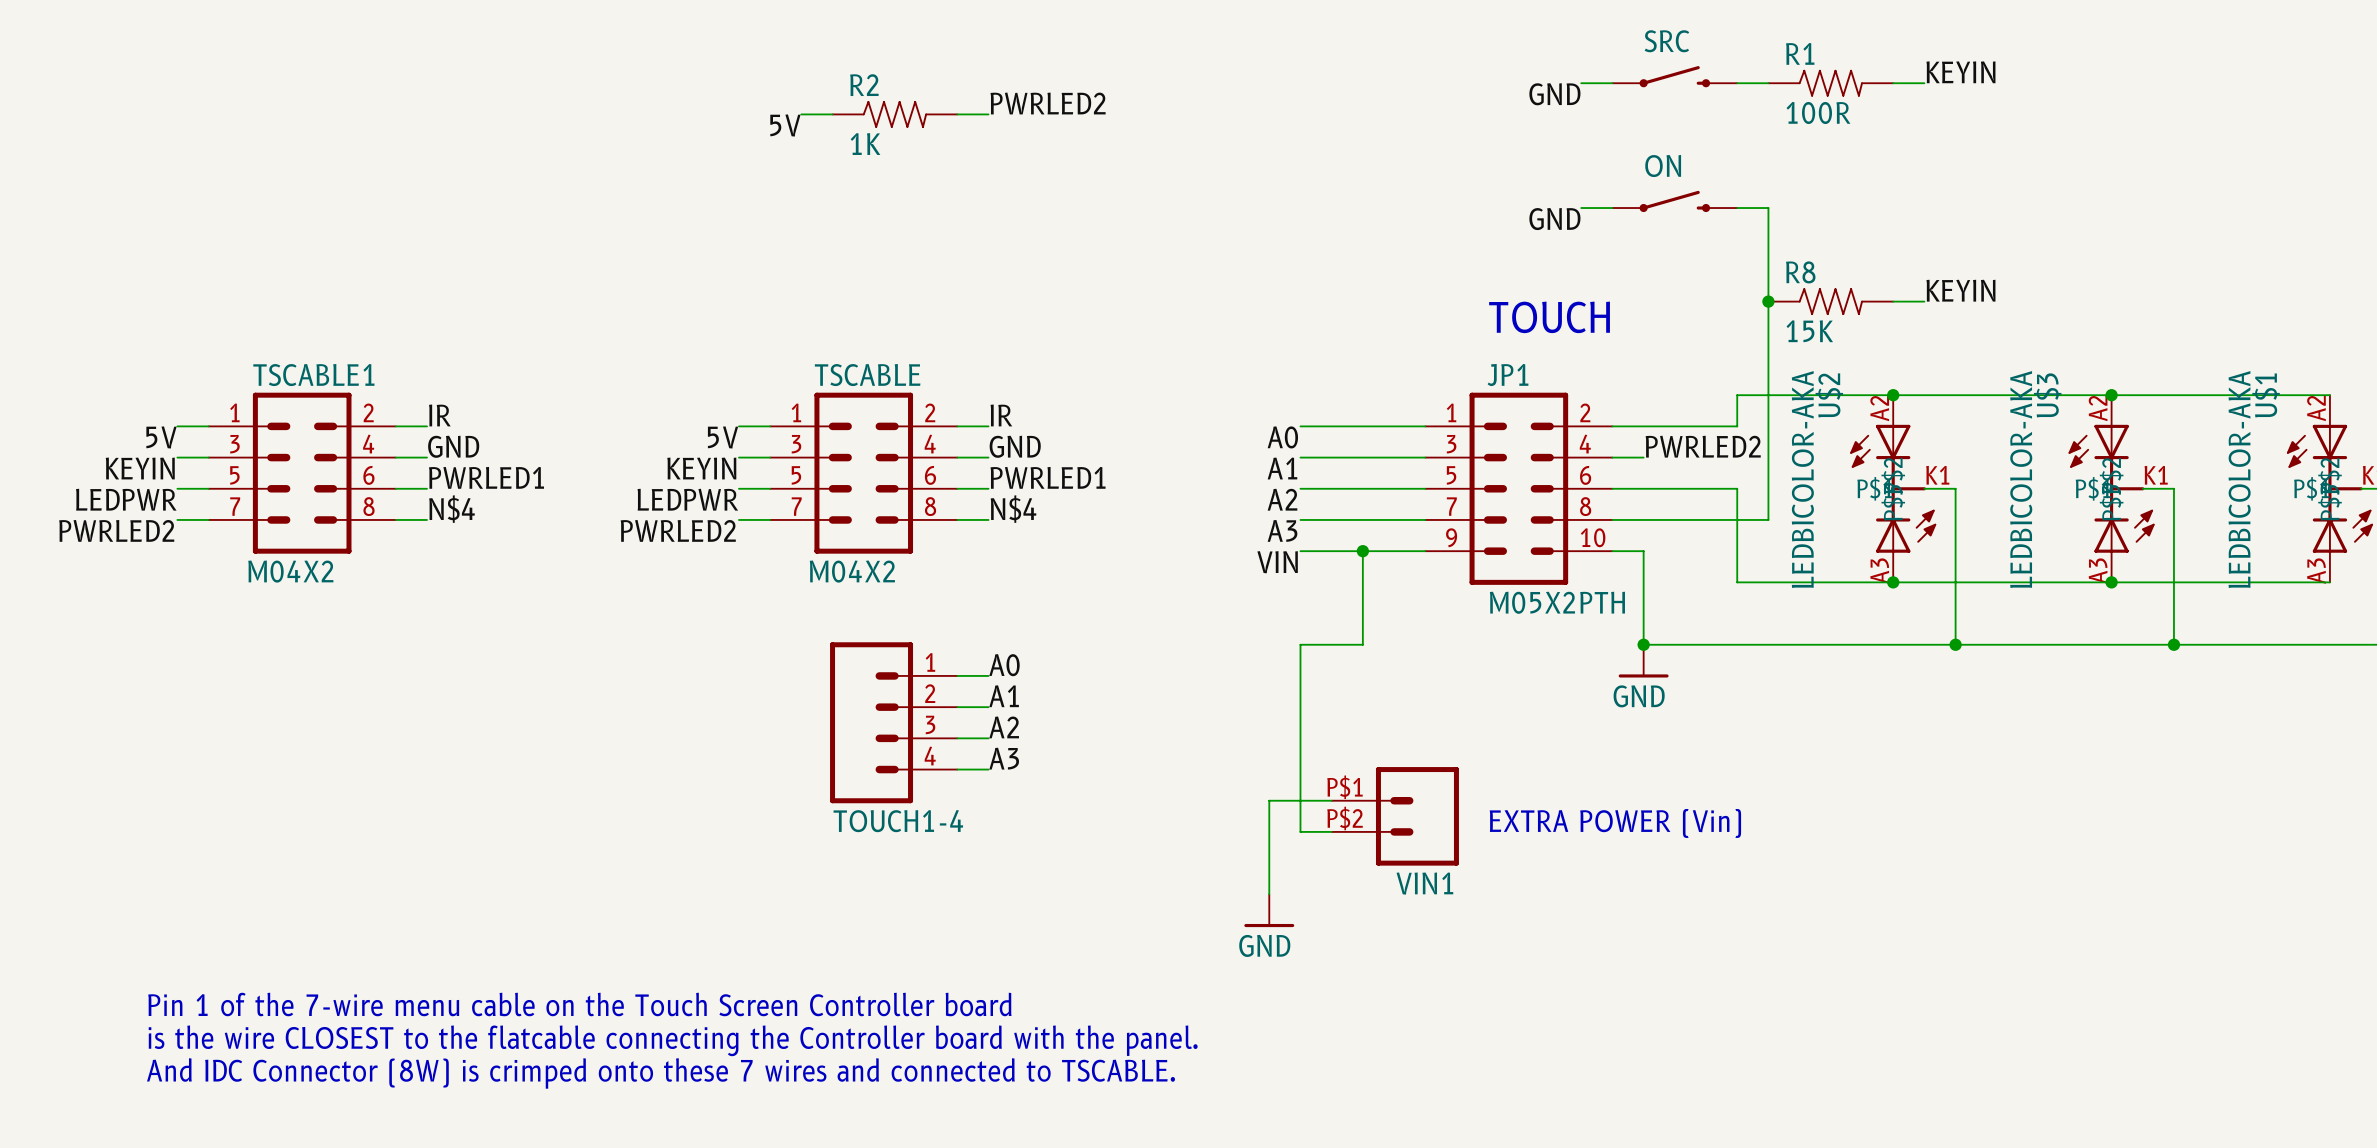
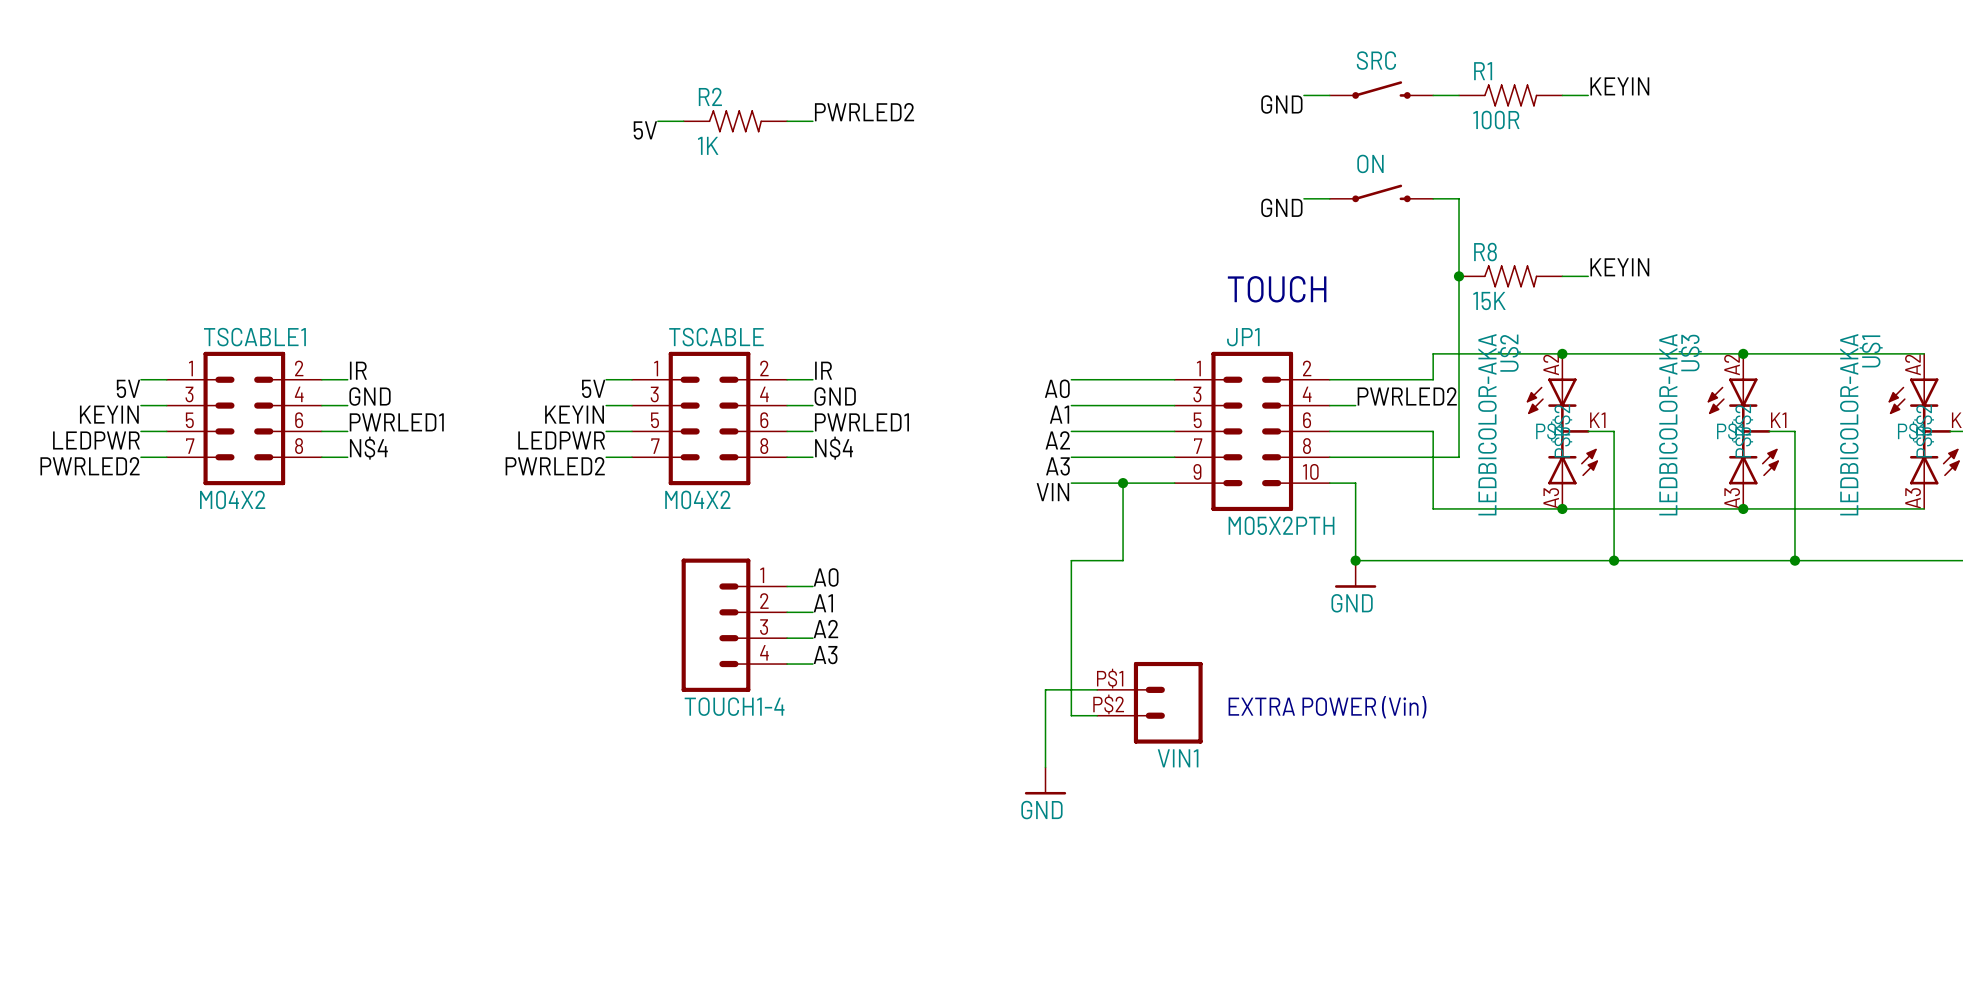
text: Pin 1 of the 7-wire menu cable on the Touch Screen Controller board (579, 1004) -> none
text: is the wire CLOSEST to the flatcable connecting the Controller board with the panel. (673, 1040) -> none
text: And IDC Connector (8W) is crimped onto these 7 wires and connected to TSCABLE. (661, 1073) -> none

